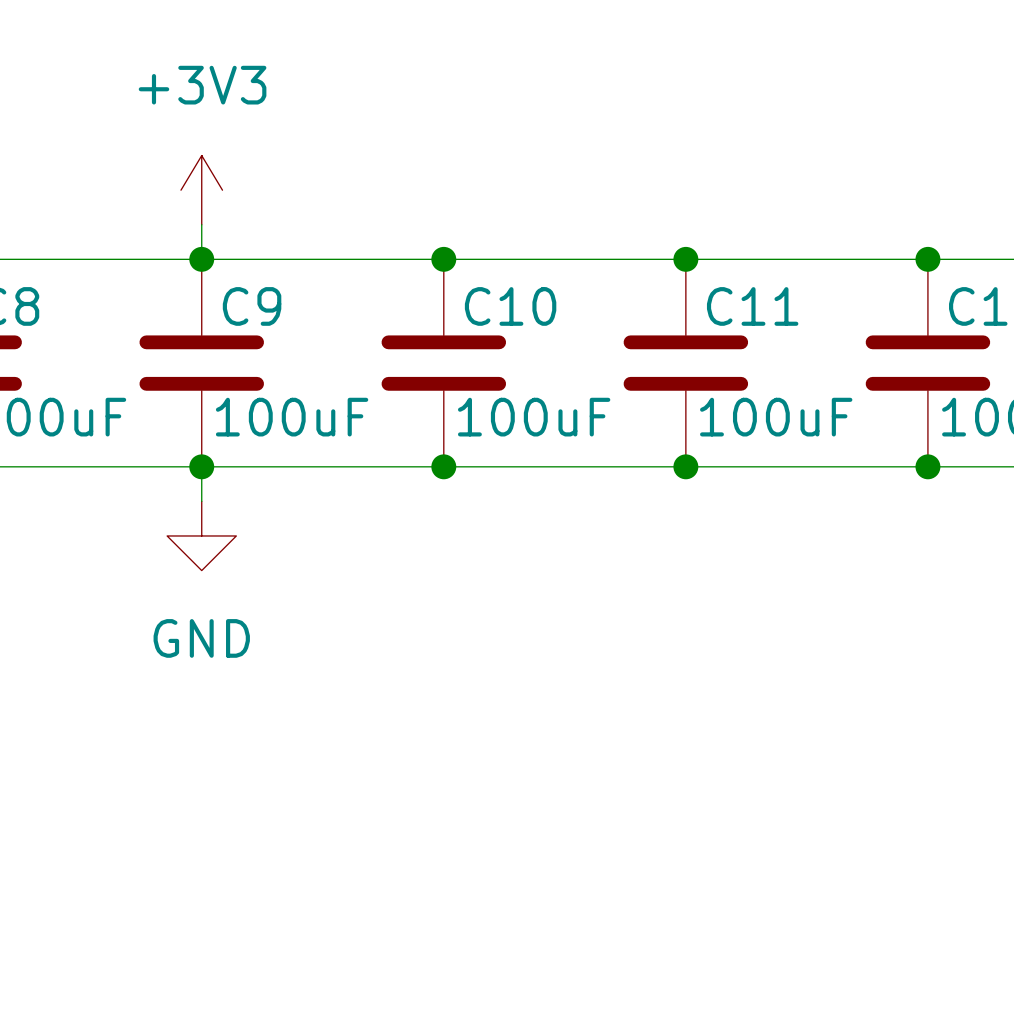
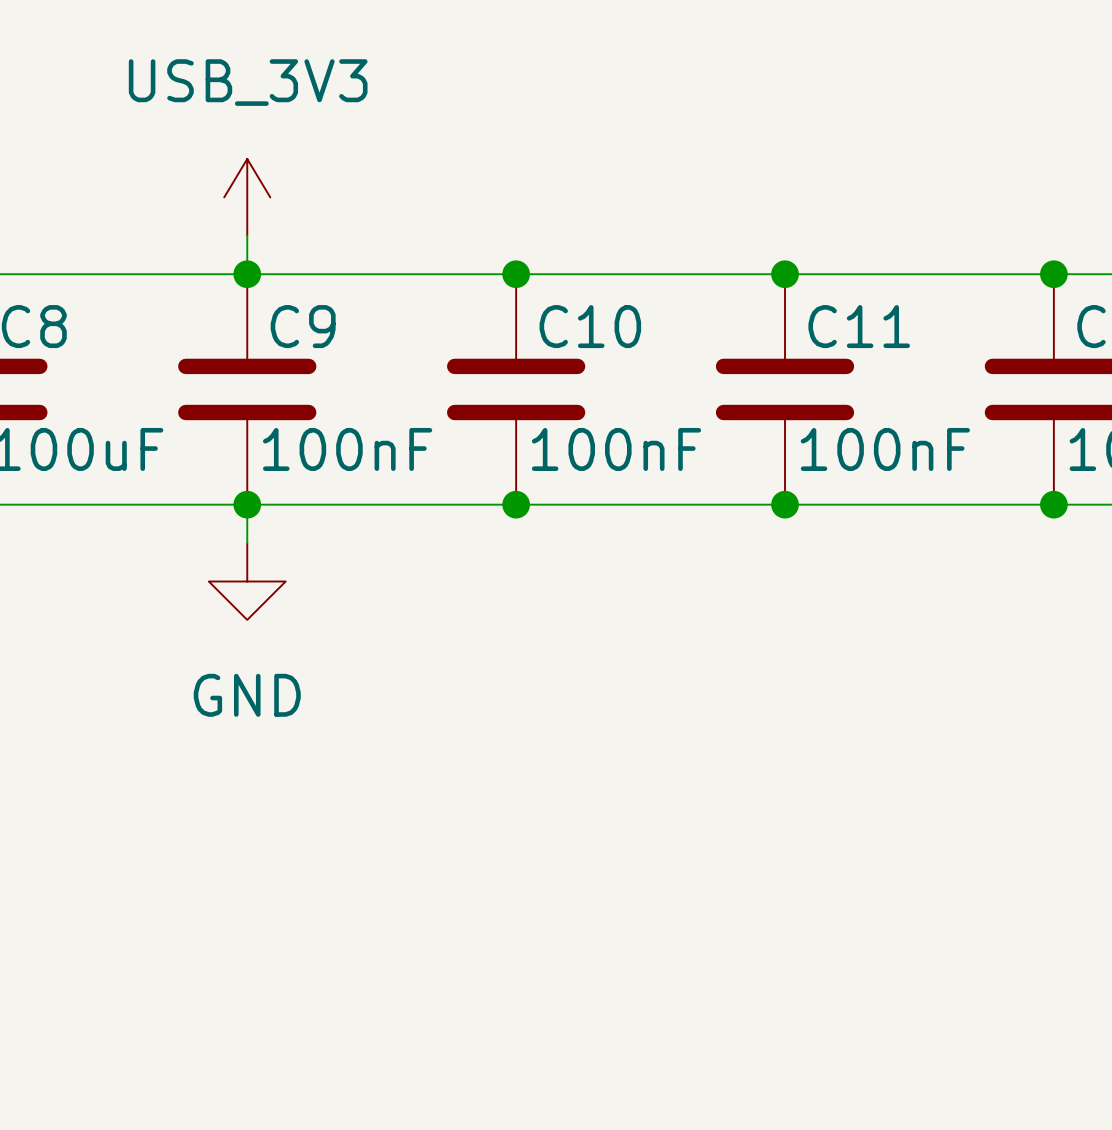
power symbol: +3V3 (201, 190) -> USB_3V3 (247, 197)
C9 value: 100uF (292, 417) -> 100nF (347, 449)
C10 value: 100uF (534, 417) -> 100nF (616, 449)
C11 value: 100uF (776, 417) -> 100nF (885, 449)

